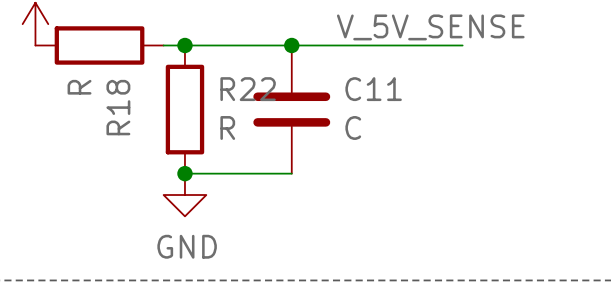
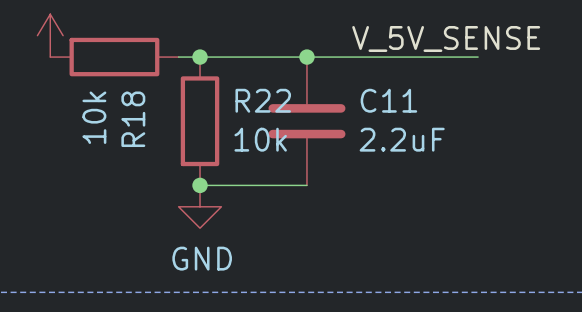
R18 value: R (79, 87) -> 10k (94, 117)
R22 value: R (227, 127) -> 10k (260, 139)
C11 value: C (353, 127) -> 2.2uF (402, 139)

